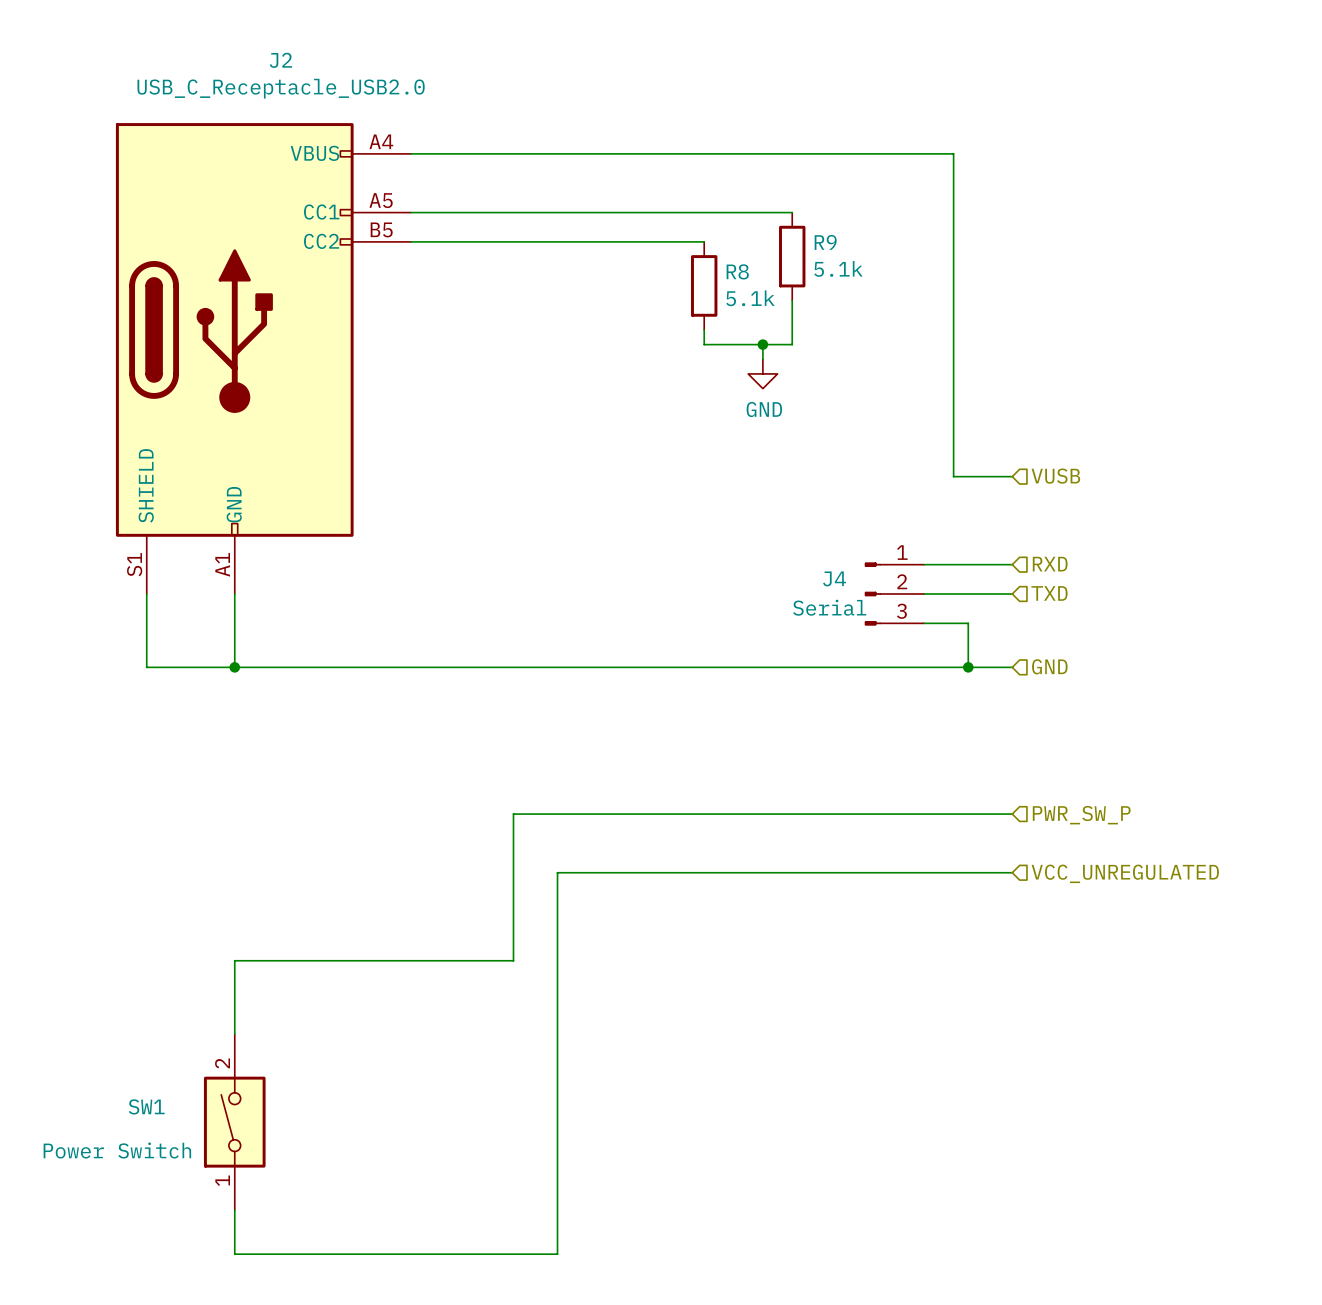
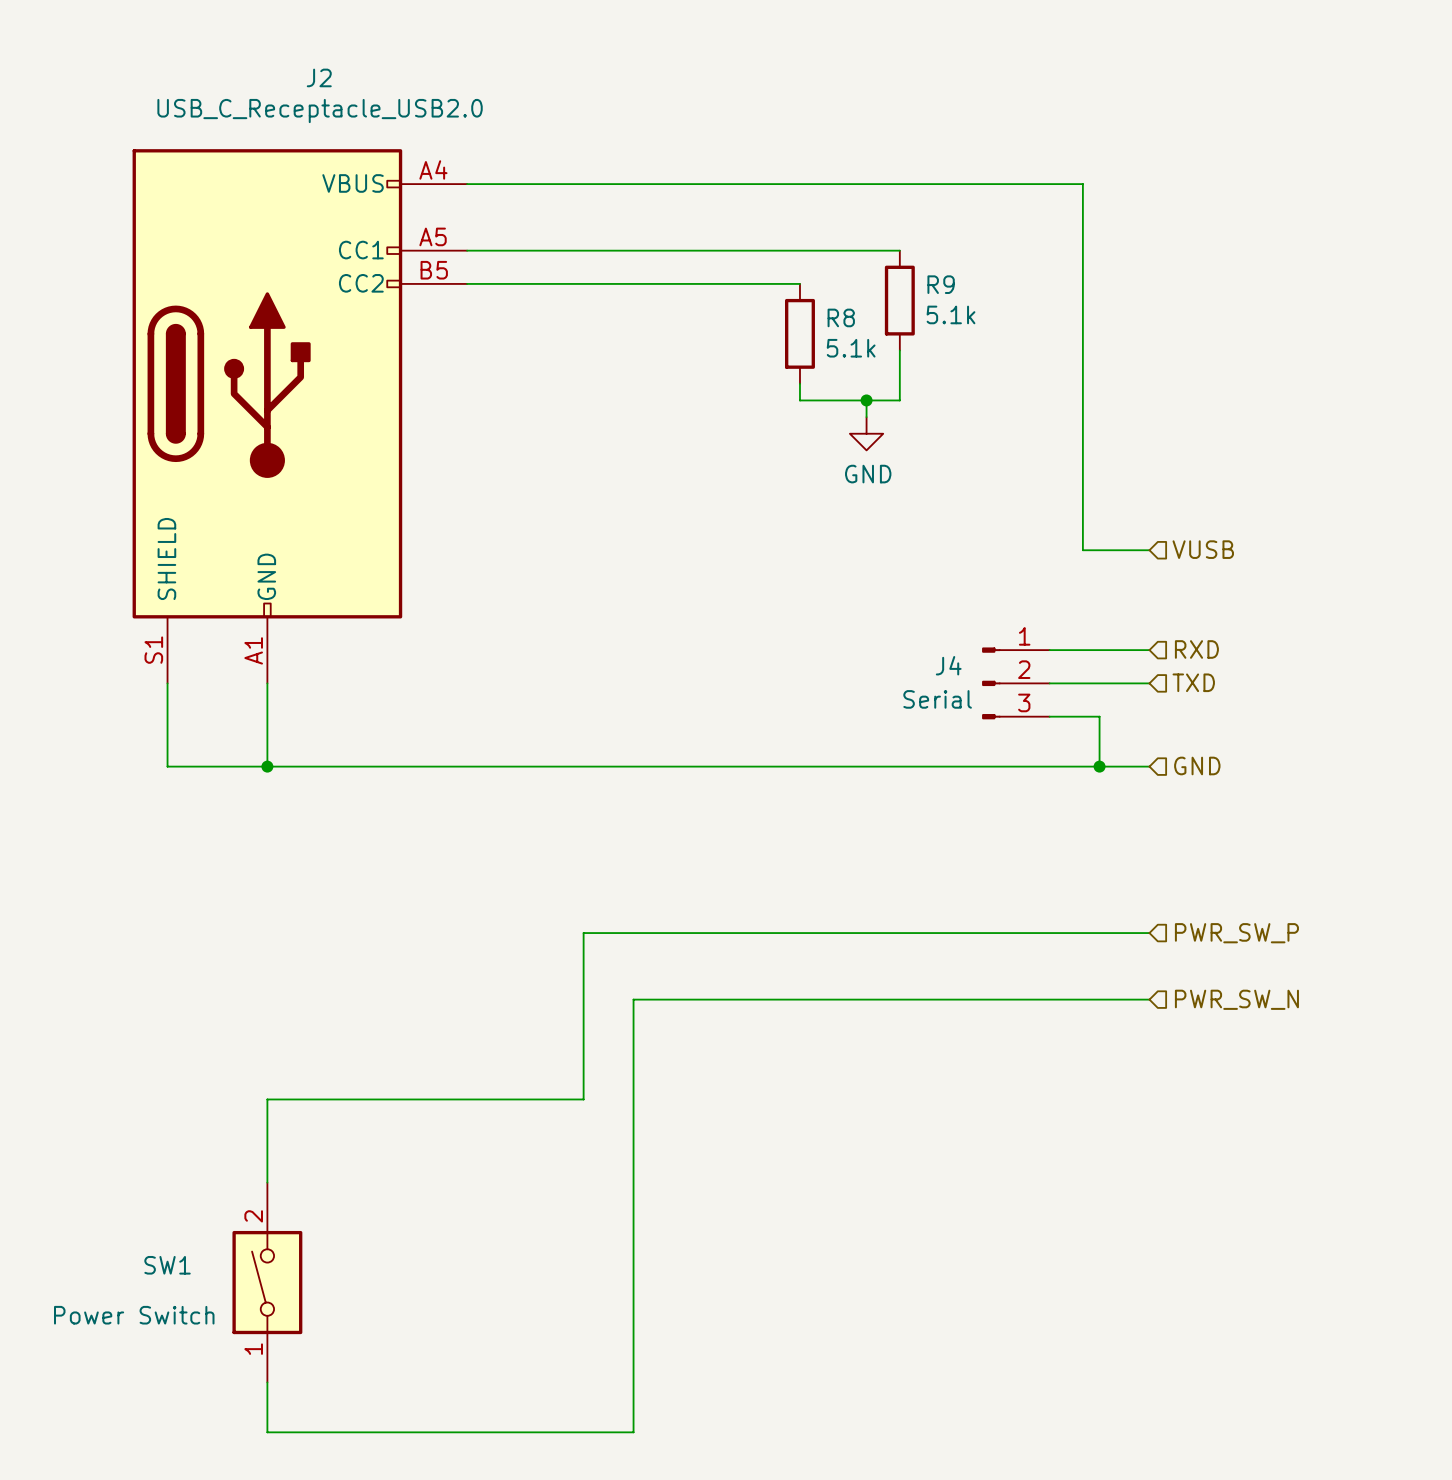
hierarchical label: VCC_UNREGULATED (1125, 873) -> PWR_SW_N (1236, 999)

